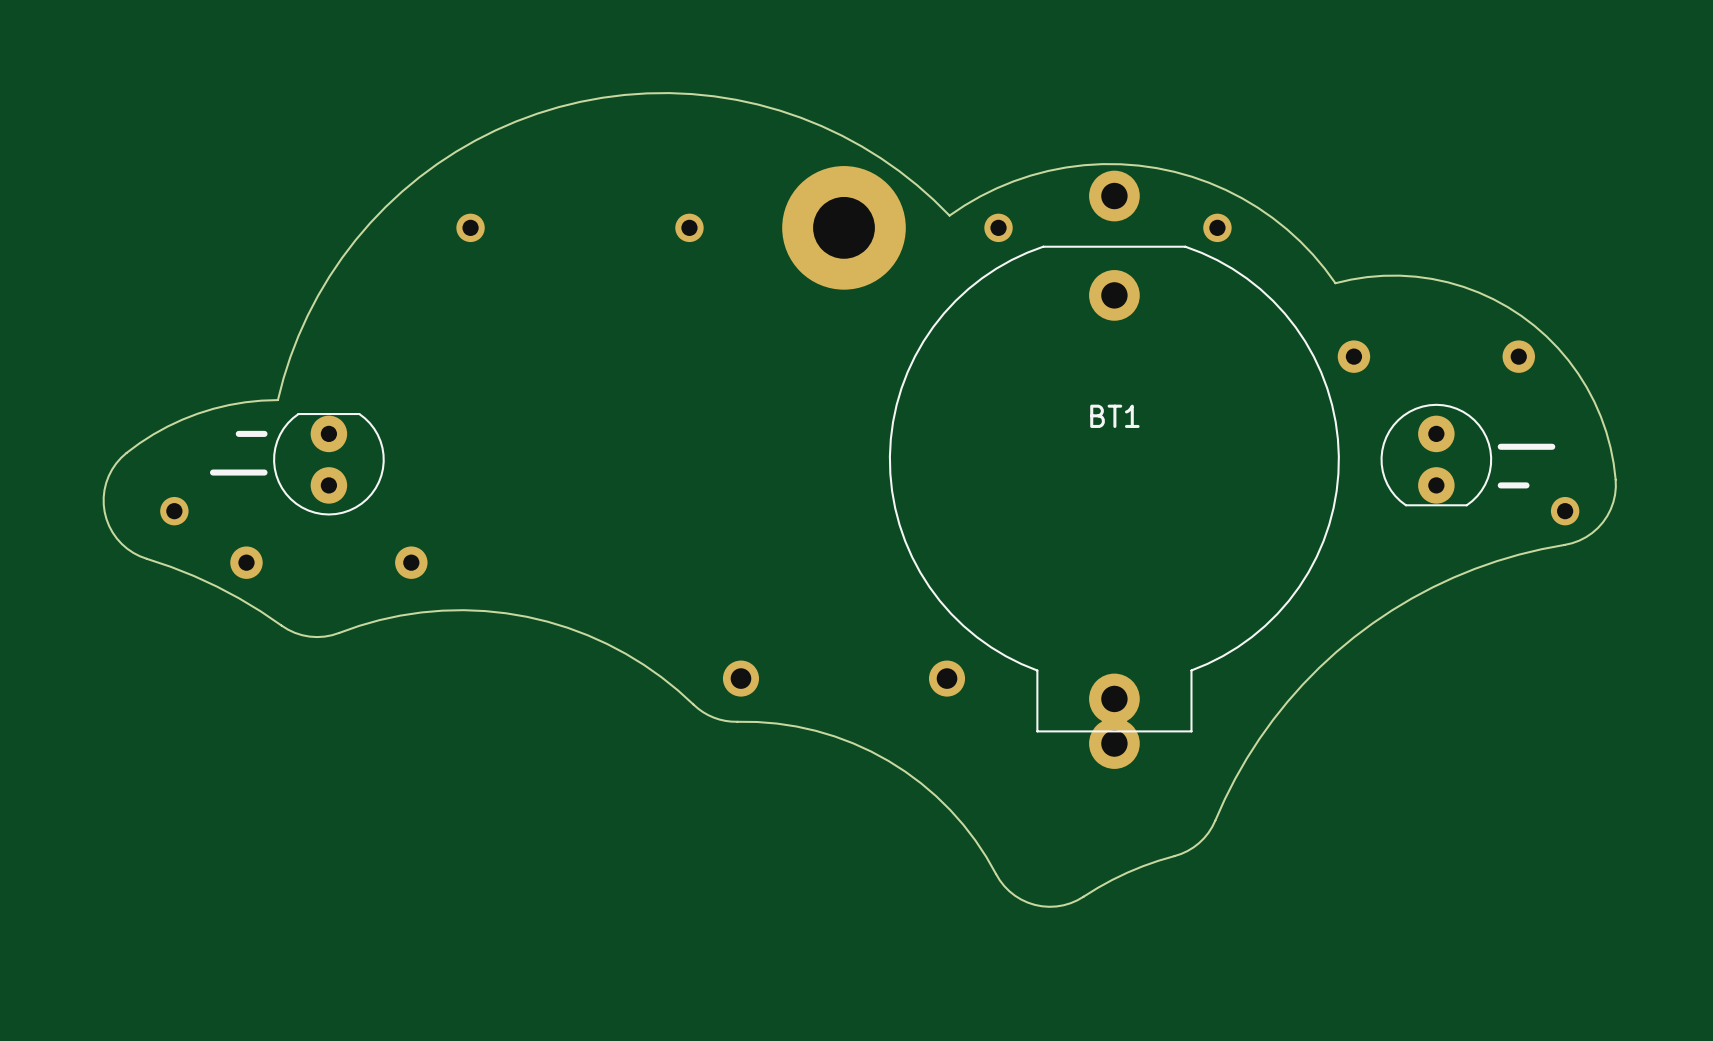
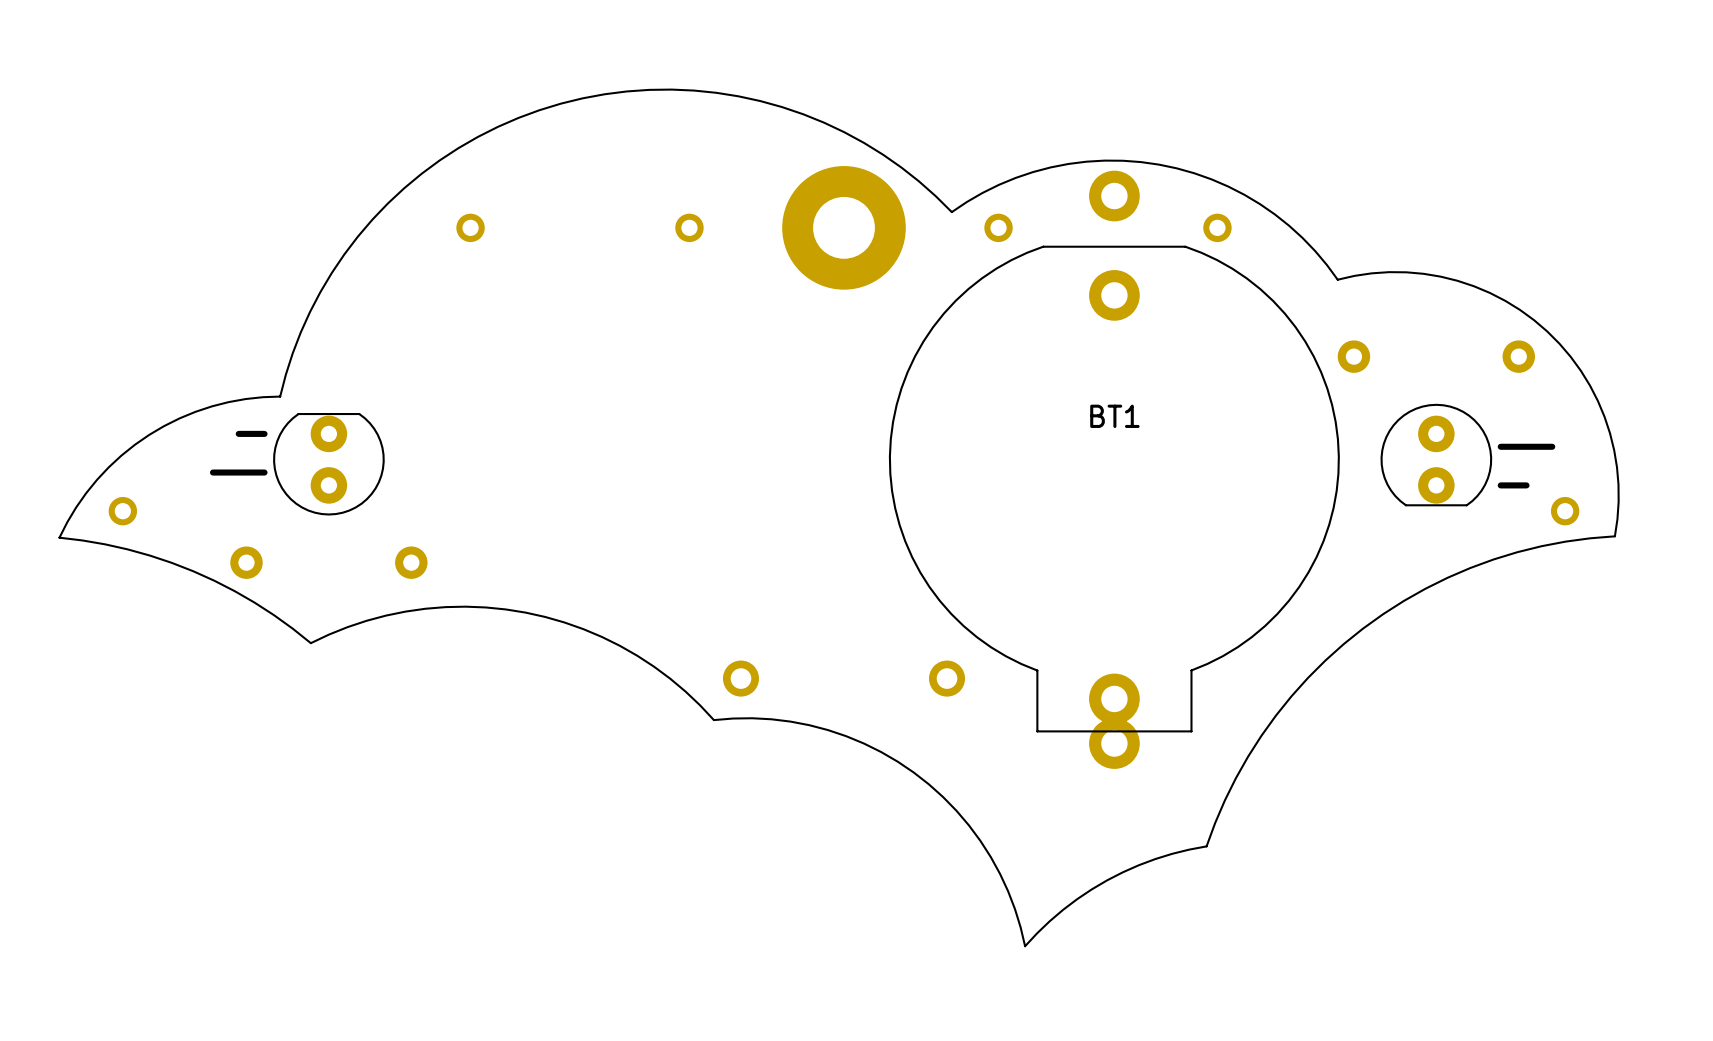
board edge: (949, 215) (996, 188) (1048, 170) (1102, 164) (1156, 168) (1209, 182) (1257, 207) (1300, 241) (1335, 283) (1367, 277) (1399, 275) (1447, 282) (1478, 292) (1521, 315) (1546, 336) (1568, 360) (1586, 387) (1600, 416) (1613, 463) (1615, 487) (1610, 509) (1597, 527) (1579, 540) (1519, 554) (1474, 568) (1432, 587) (1372, 623) (1319, 667) (1272, 720) (1235, 778) (1212, 826) (1199, 843) (1181, 853) (1127, 872) (1070, 903) (1049, 906) (1027, 902) (1009, 891) (999, 880) (986, 856) (963, 824) (936, 796) (888, 760) (853, 743) (796, 726) (757, 721) (731, 721) (713, 717) (698, 708) (661, 677) (625, 653) (567, 627) (526, 616) (484, 611) (442, 610) (379, 620) (324, 636) (302, 635) (287, 629) (216, 586) (133, 552) (116, 538) (106, 519) (103, 497) (108, 476) (121, 457) (139, 443) (167, 426) (213, 408) (245, 402) (277, 400) (290, 357) (318, 295) (342, 257) (385, 206) (419, 177) (456, 151) (495, 130) (537, 113) (602, 97) (647, 93) (691, 94) (758, 104) (801, 117) (861, 146) (899, 171) (949, 215) -> (951, 212) (998, 184) (1050, 167) (1104, 160) (1159, 164) (1211, 179) (1259, 204) (1302, 238) (1337, 279) (1371, 273) (1406, 272) (1440, 276) (1489, 292) (1520, 309) (1547, 331) (1570, 356) (1590, 385) (1604, 416) (1617, 467) (1618, 501) (1614, 536) (1565, 541) (1493, 559) (1447, 577) (1383, 614) (1325, 660) (1275, 715) (1235, 778) (1206, 846) (1155, 859) (1107, 880) (1063, 909) (1025, 946) (1008, 891) (990, 857) (968, 825) (943, 797) (913, 772) (863, 743) (827, 730) (790, 721) (752, 718) (713, 720) (685, 691) (637, 655) (583, 629) (545, 616) (485, 607) (425, 608) (366, 620) (310, 643) (254, 602) (193, 571) (127, 549) (59, 537) (76, 507) (96, 479) (121, 455) (149, 434) (179, 418) (211, 406) (245, 399) (280, 396) (292, 353) (309, 312) (331, 273) (372, 219) (404, 188) (439, 160) (497, 126) (539, 110) (604, 94) (649, 89) (694, 90) (760, 101) (803, 114) (864, 142) (919, 181) (951, 212)
part position: (174, 511) -> (122, 511)

